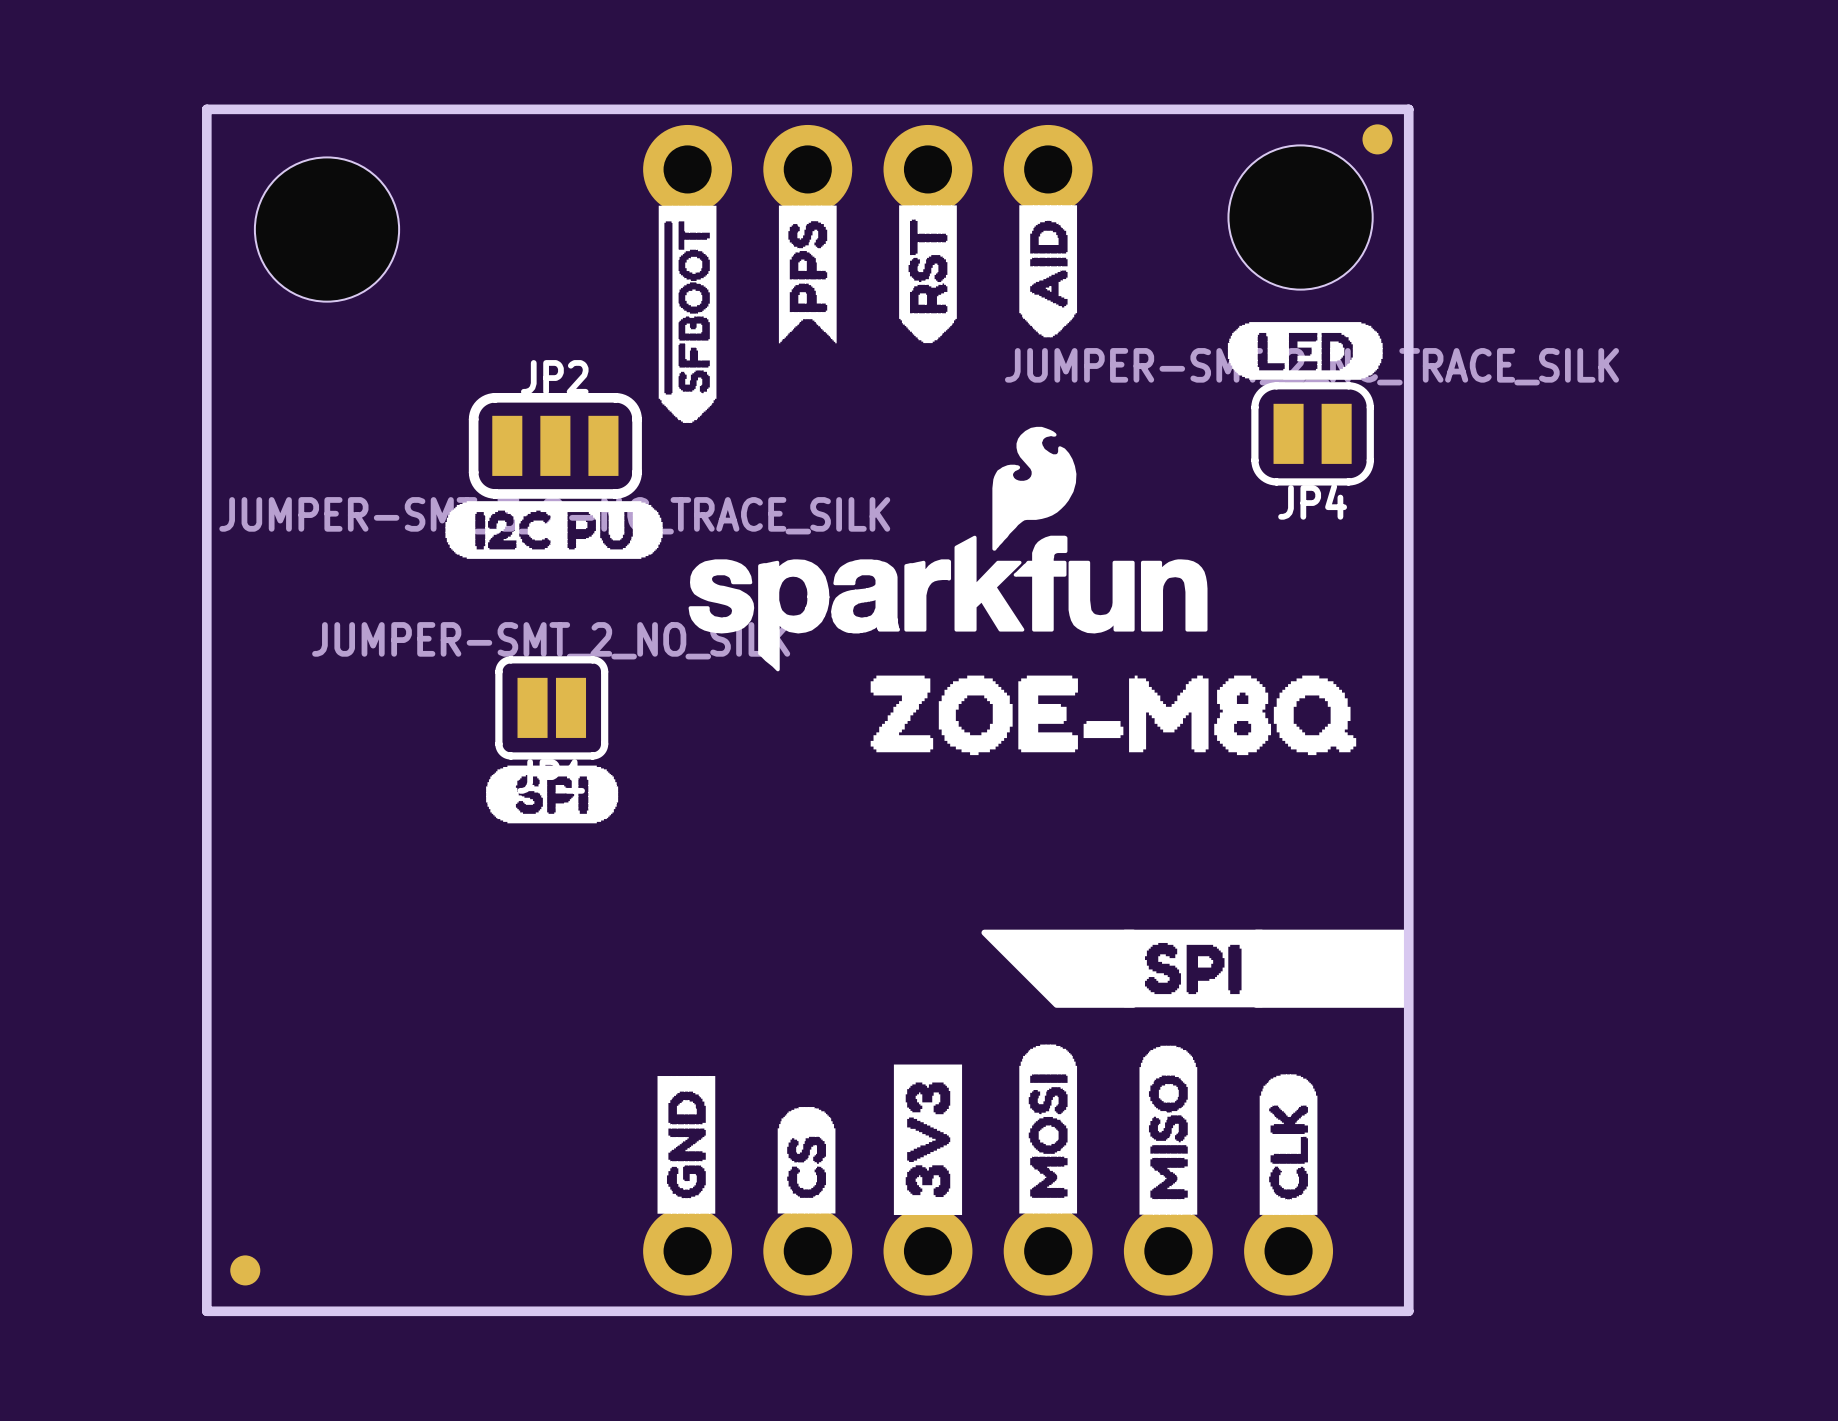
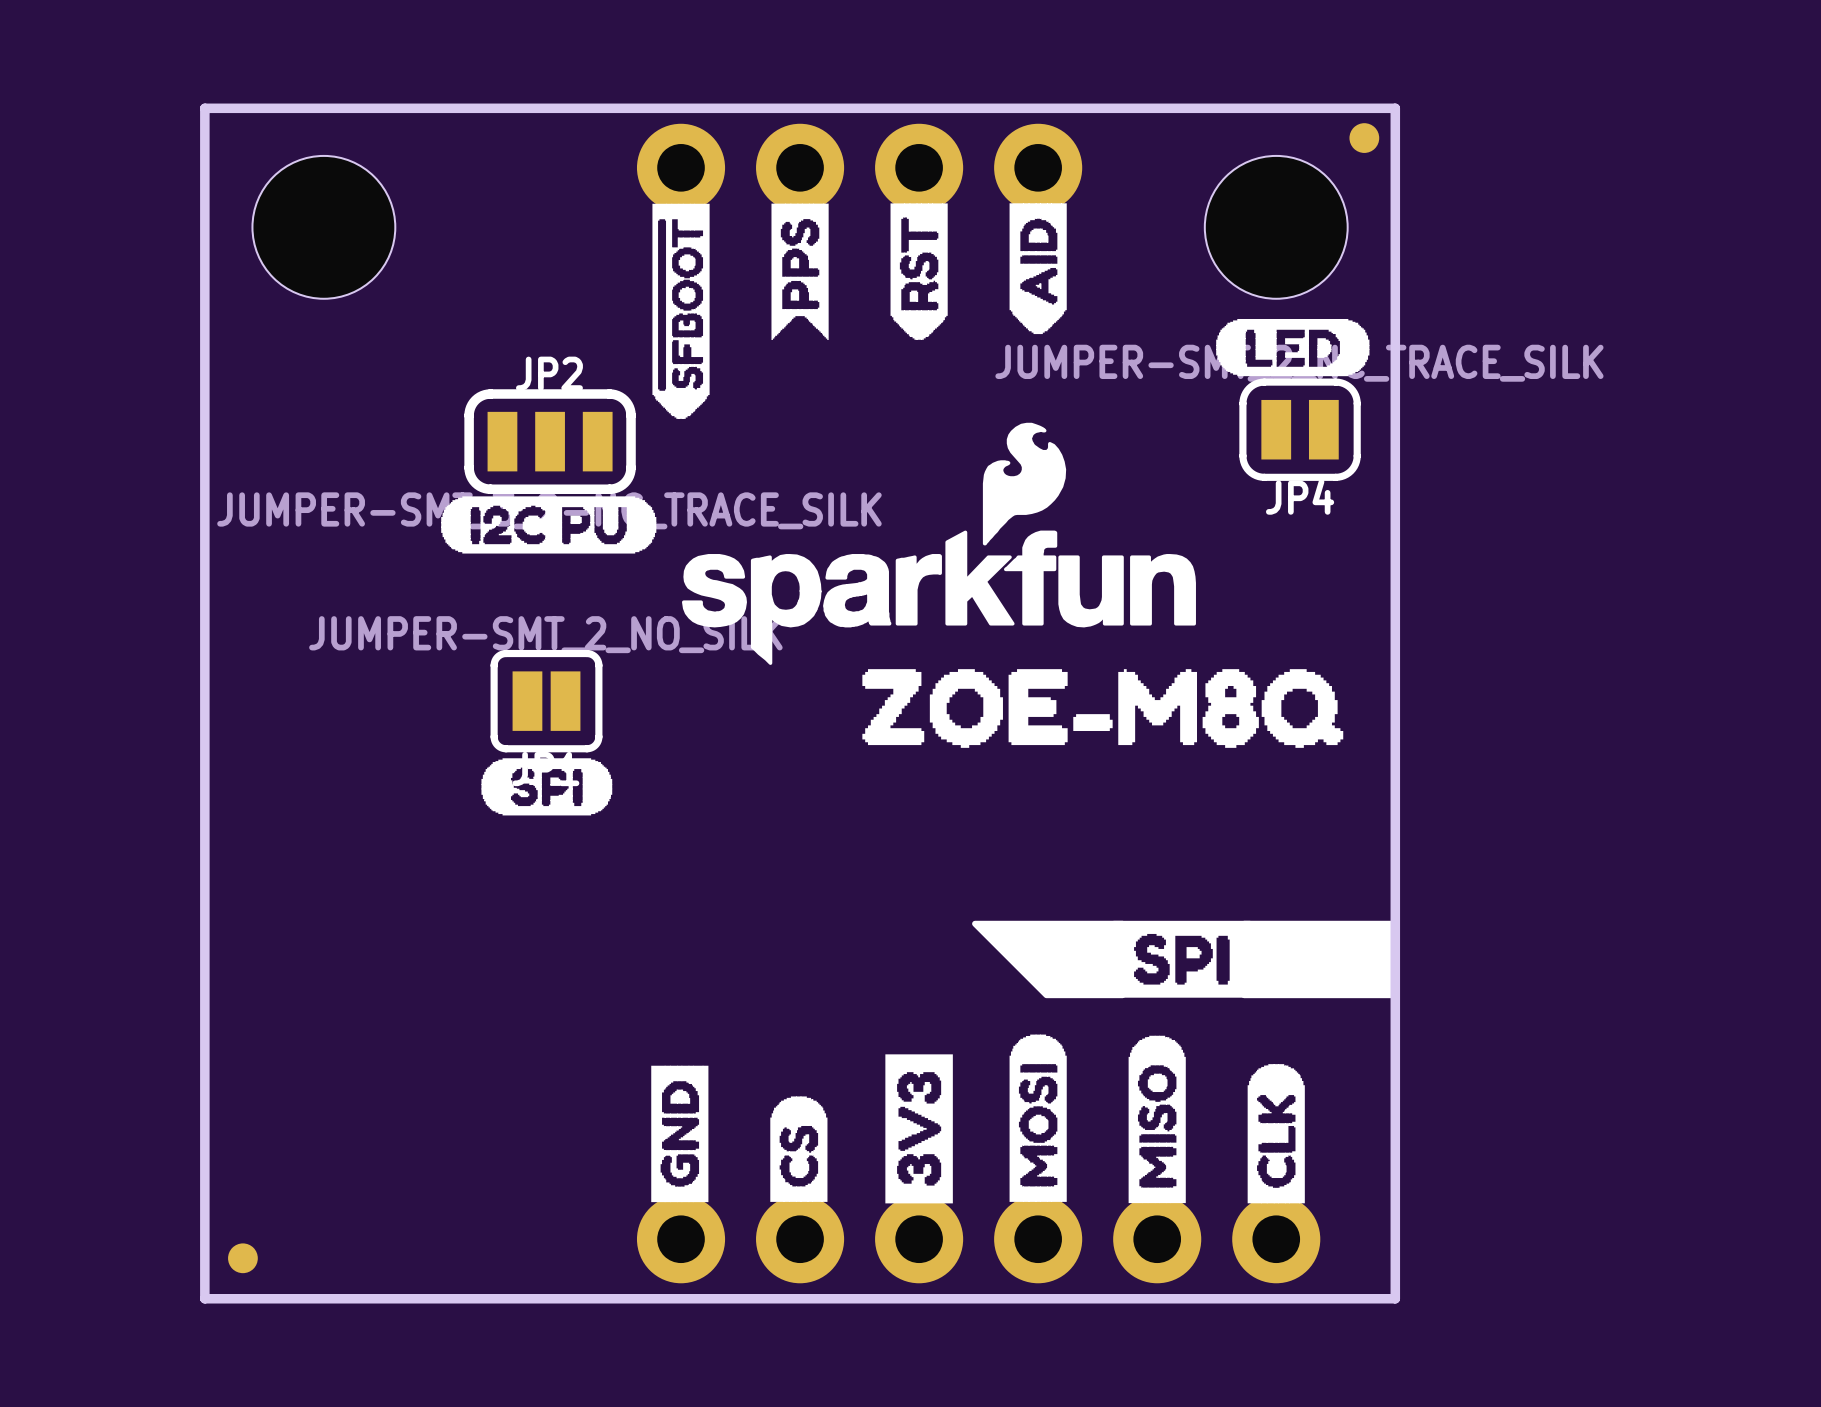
part position: (1300, 217) -> (1276, 227)

